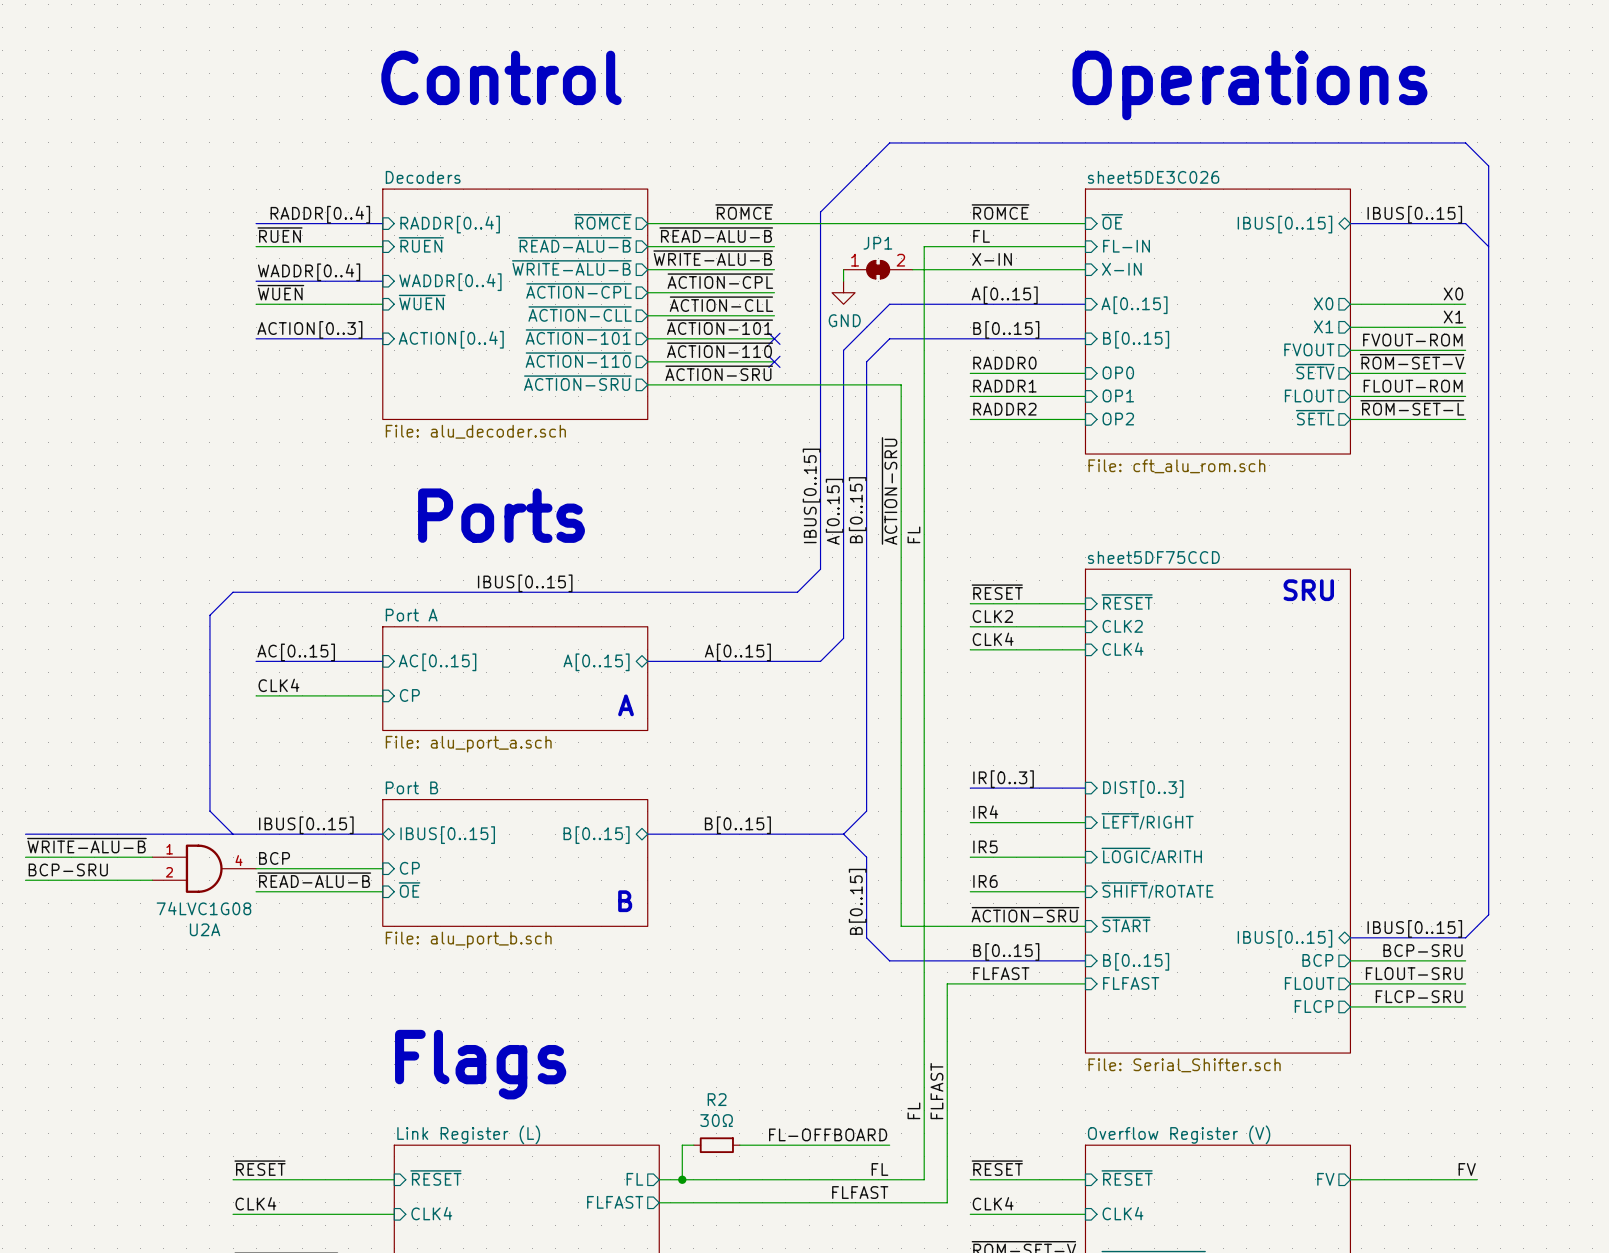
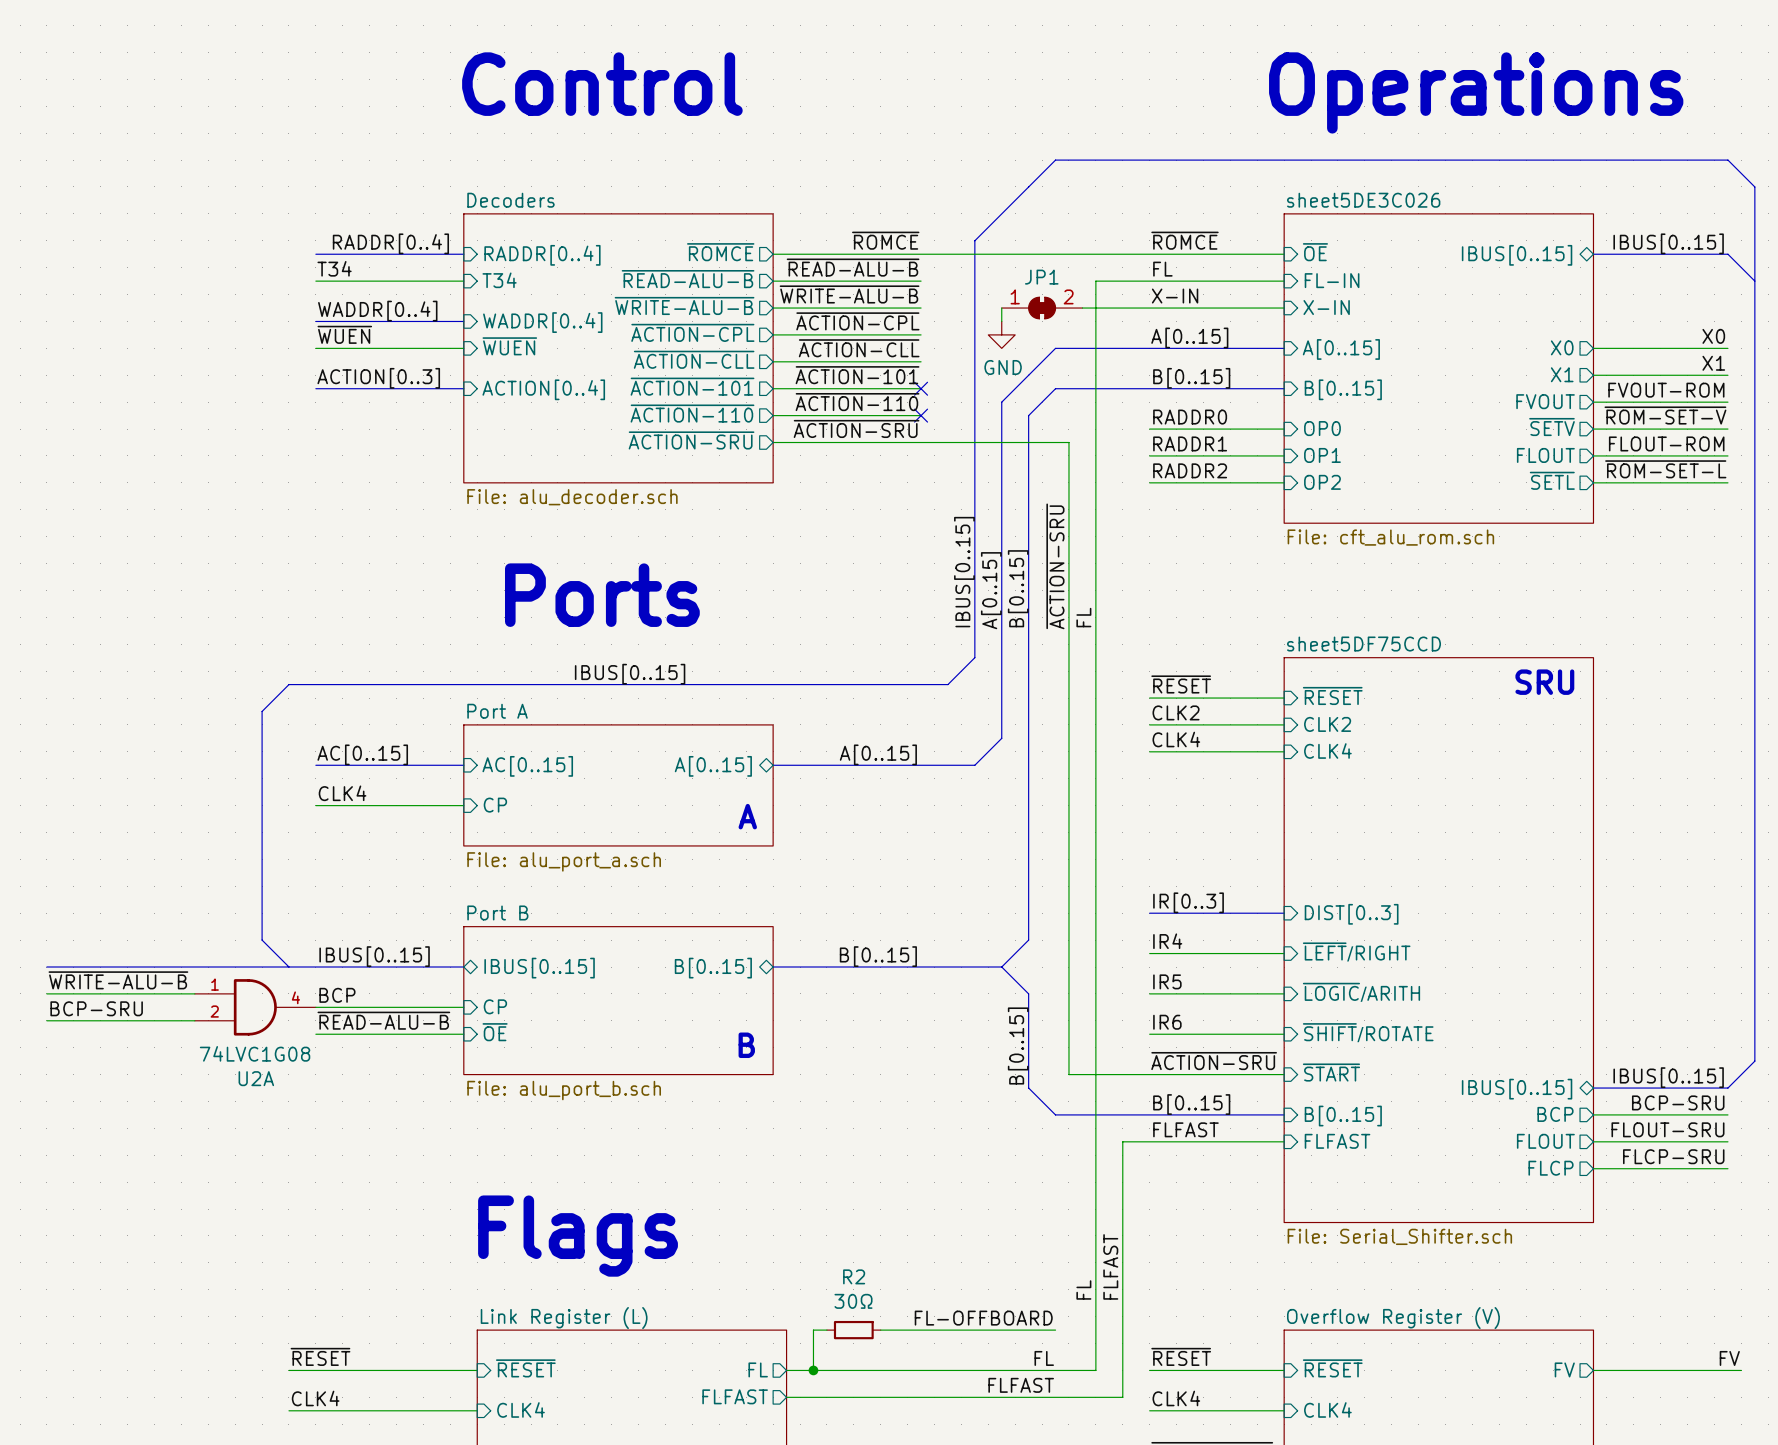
label: ~{RUEN} (280, 235) -> T34 (334, 268)
sheet pin: ~{RUEN} (421, 244) -> T34 (499, 280)

